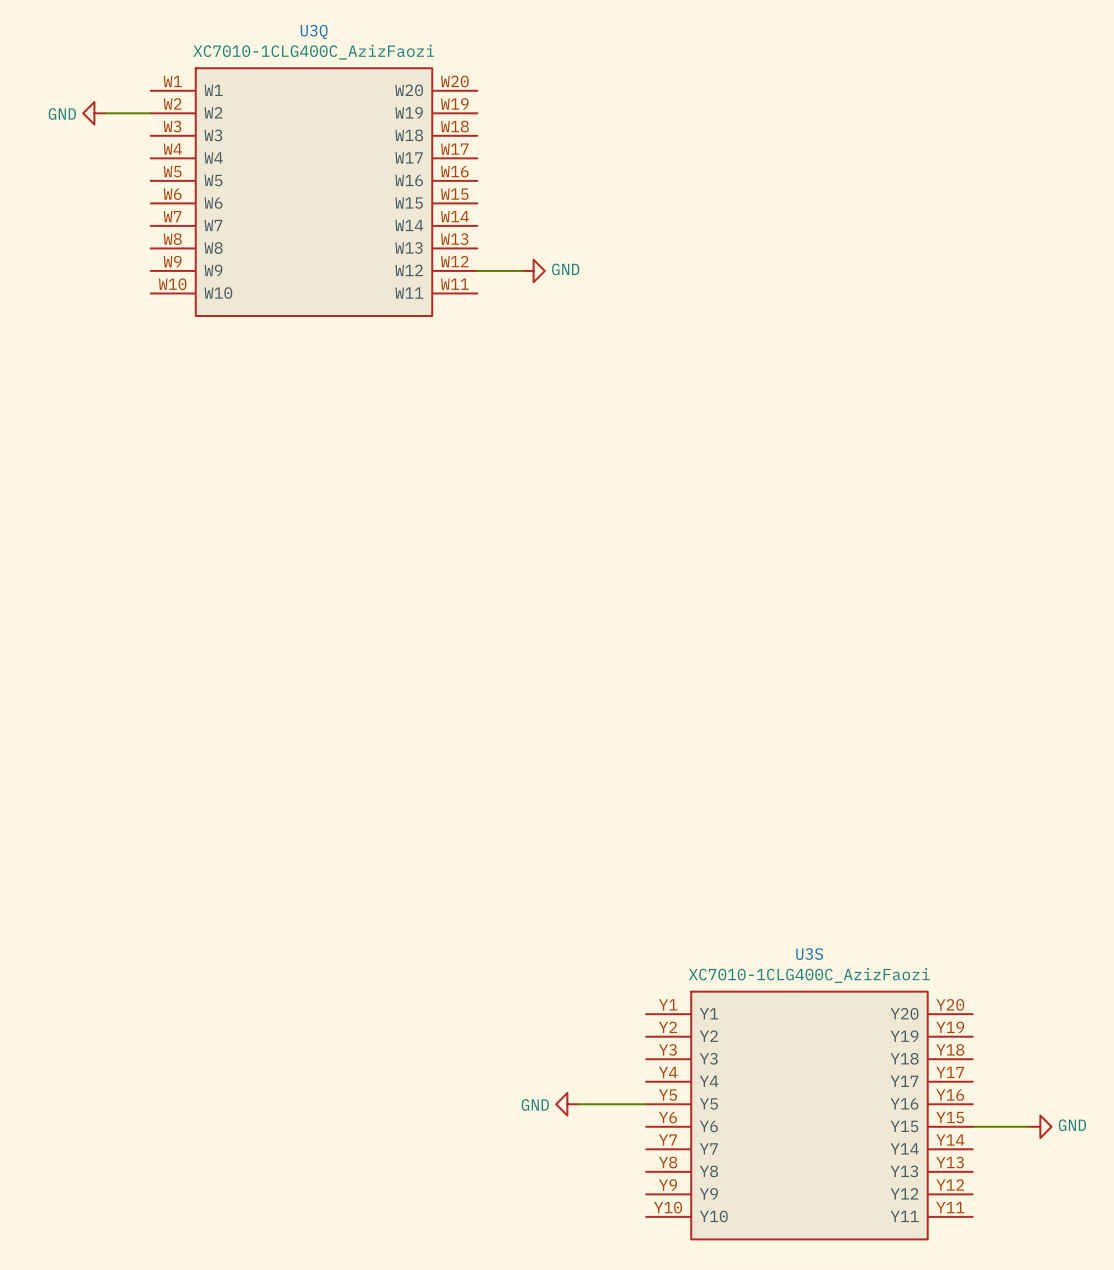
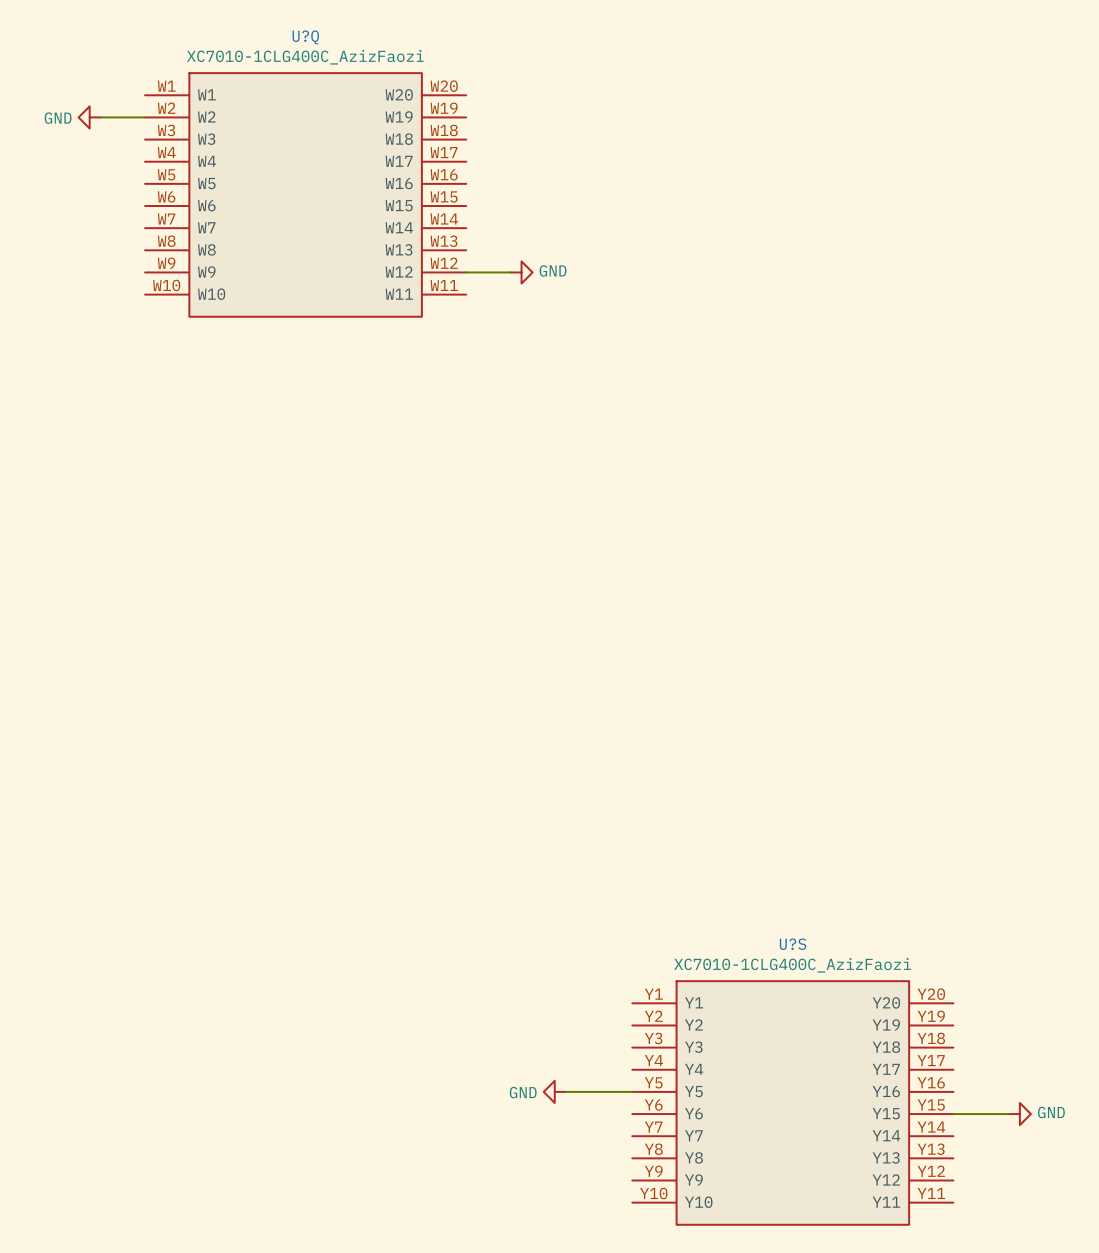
U3Q name: U3Q (314, 31) -> U?Q (305, 37)
U3S name: U3S (809, 954) -> U?S (793, 944)

